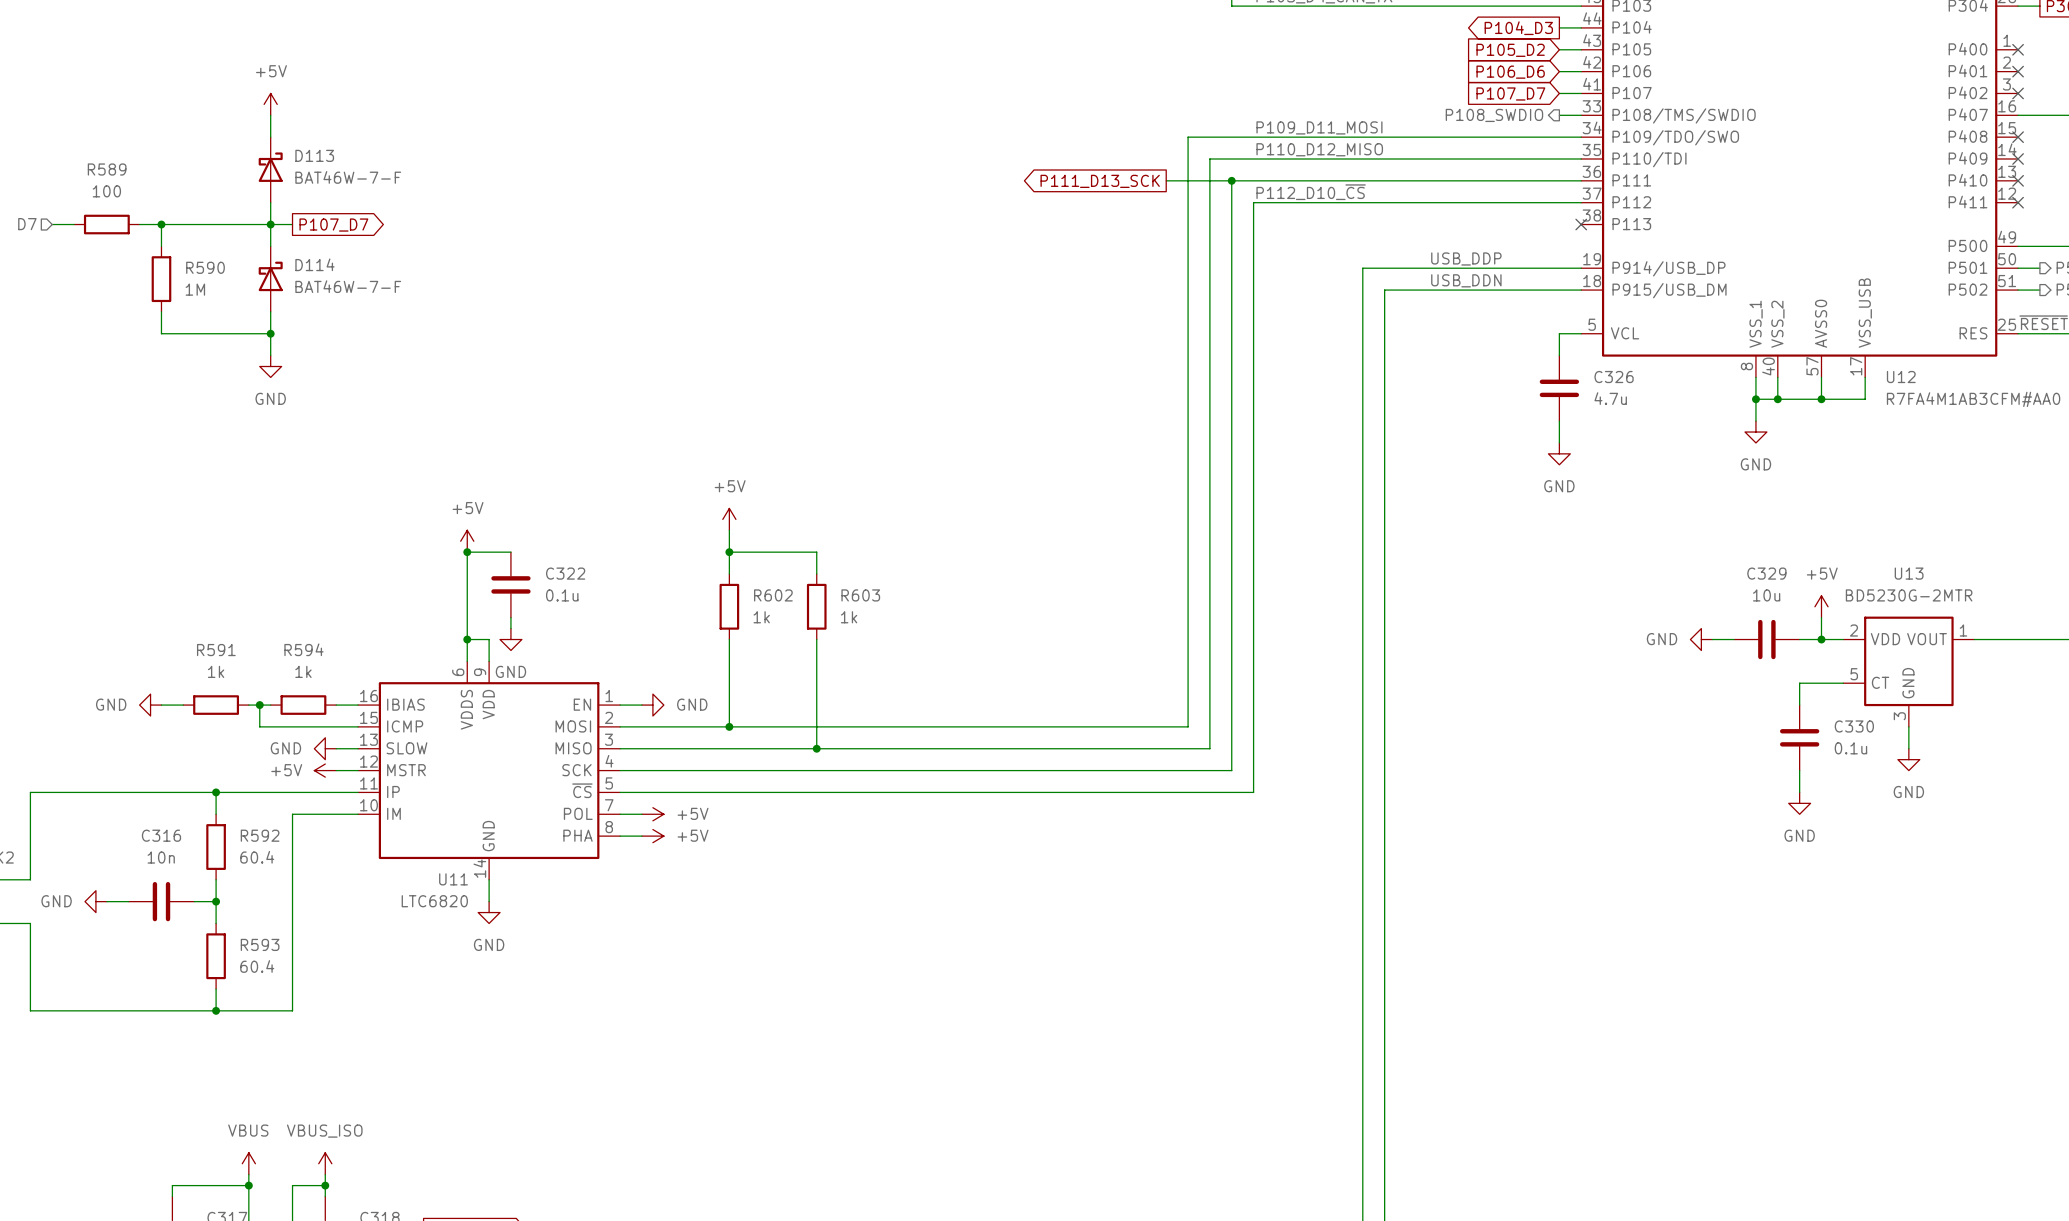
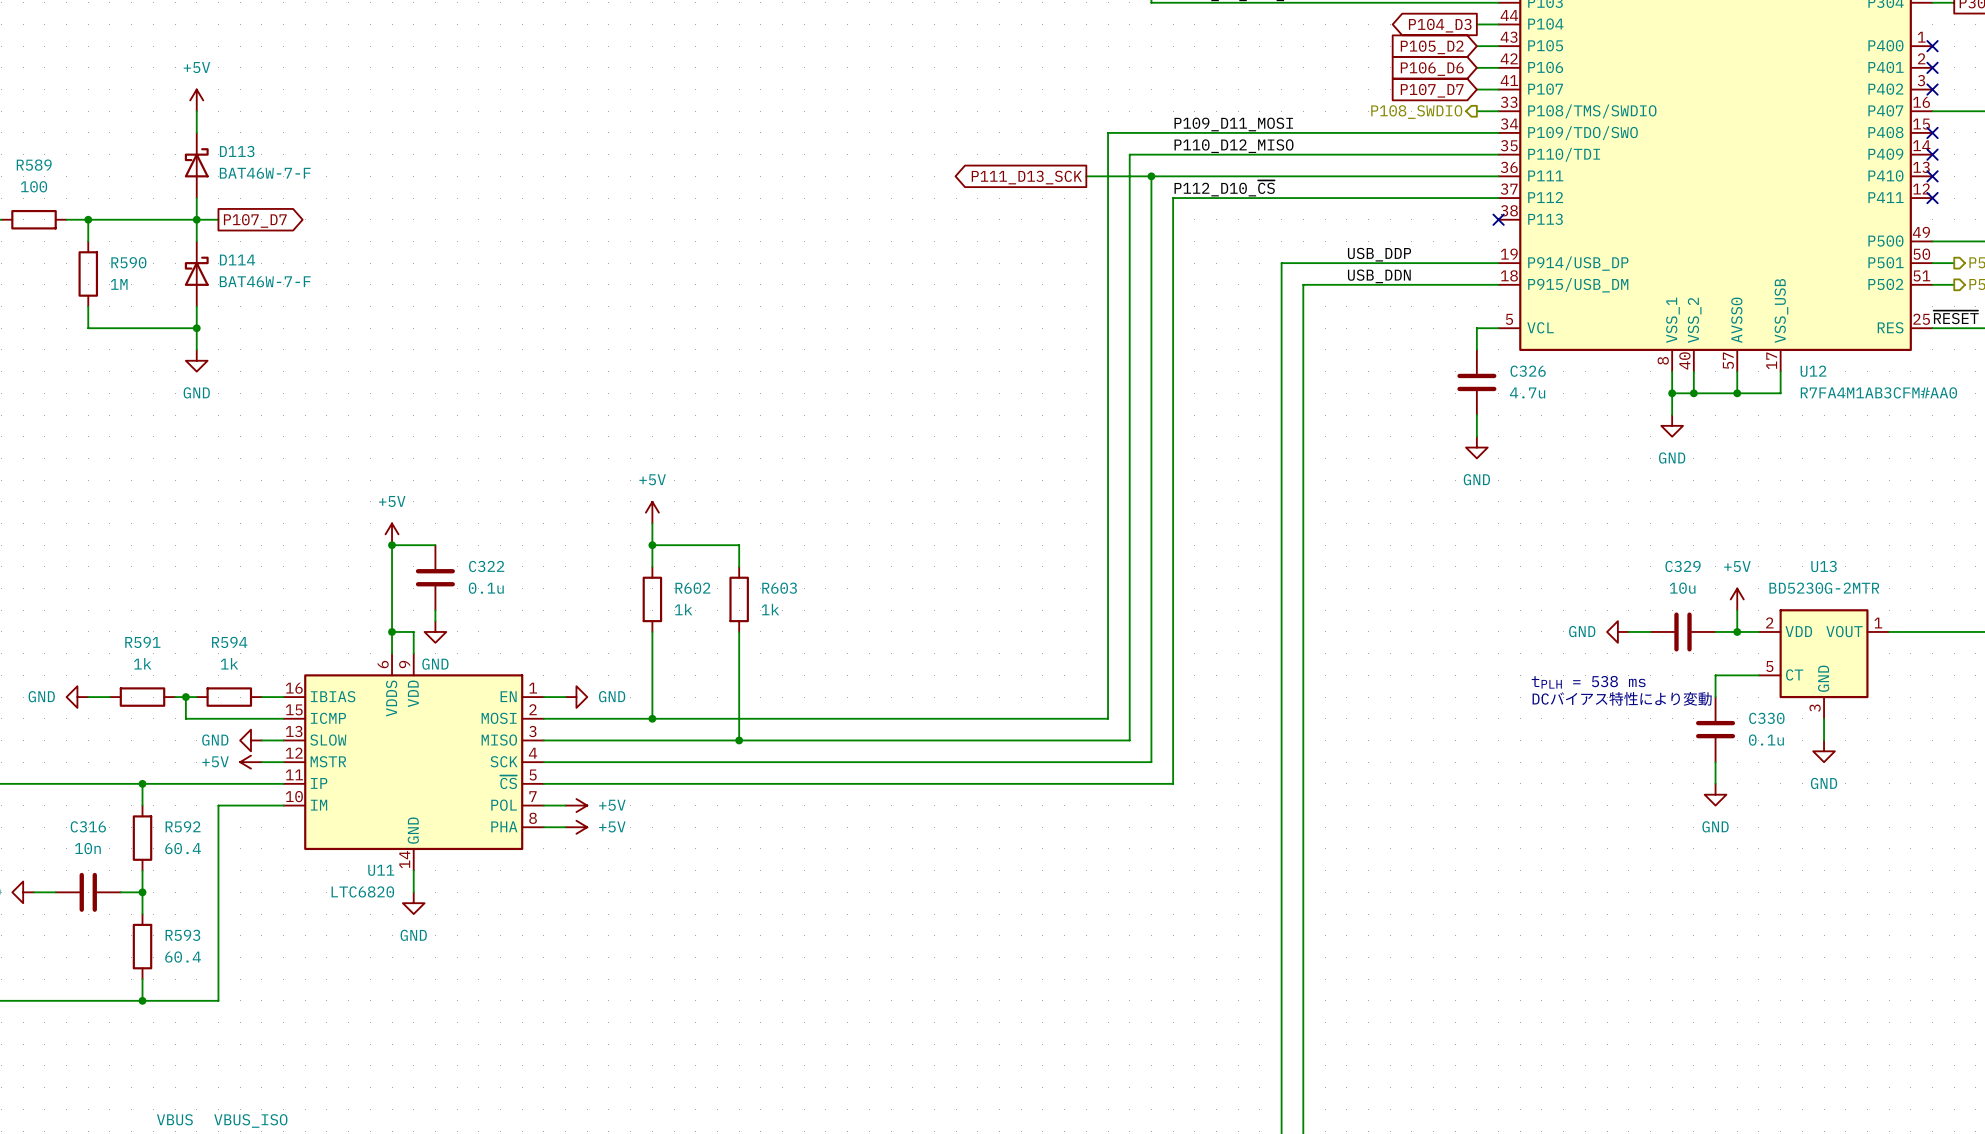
text: none -> tPLH = 538 ms (1588, 682)
text: none -> DCバイアス特性により変動 (1622, 698)

